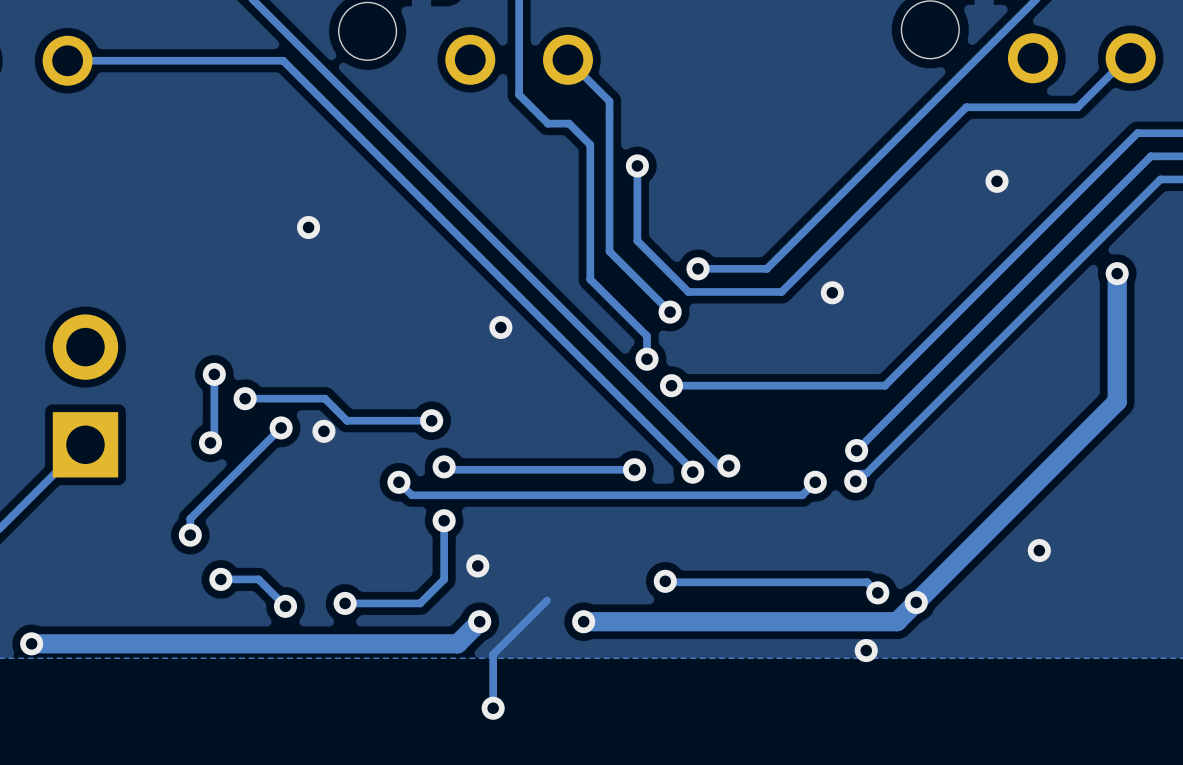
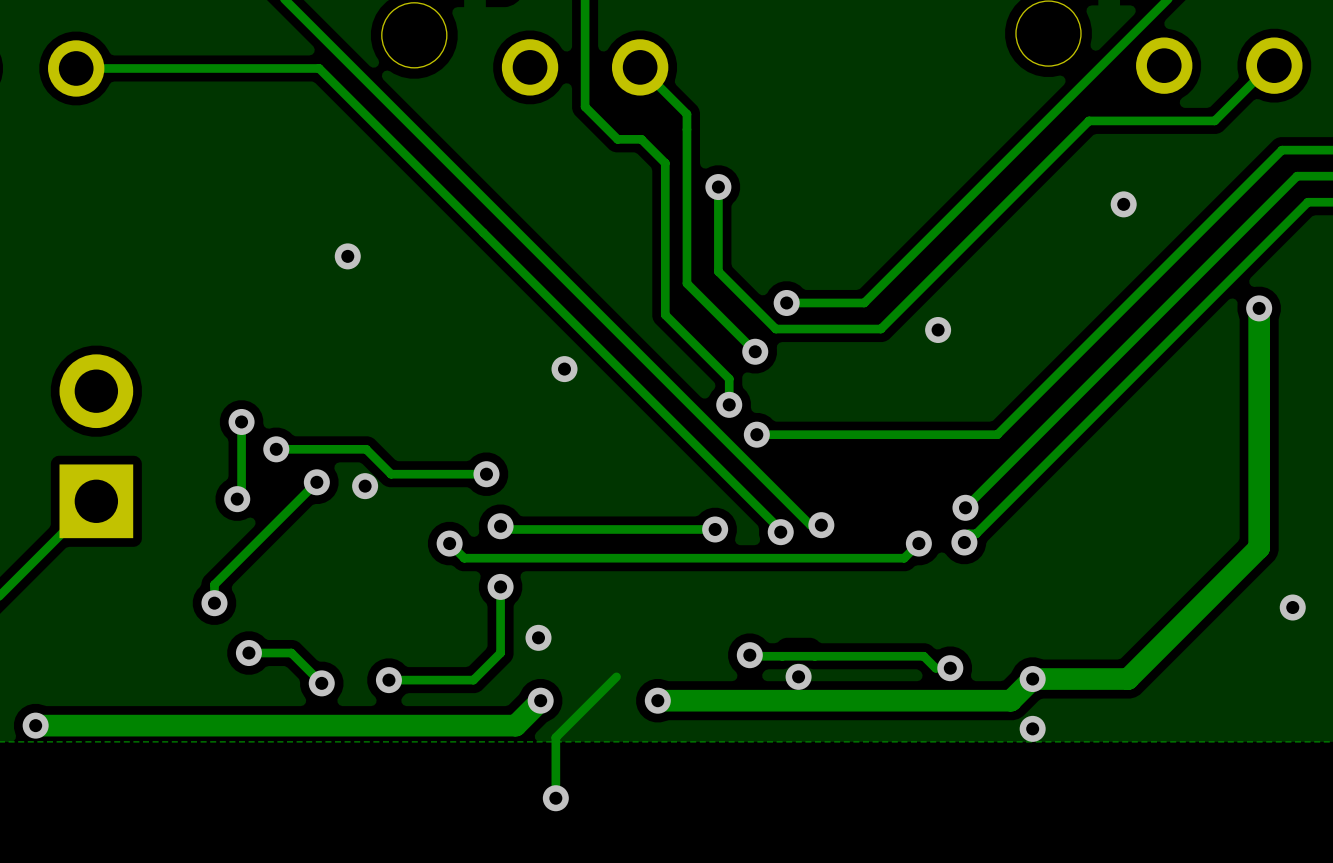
track: (1117, 401) (916, 602) -> (1259, 452) (1259, 547) (1128, 679) (1032, 679)
via: none -> (1292, 607)
via: (1039, 550) -> none
track: (819, 582) (867, 582) (877, 592) -> (923, 656) (935, 668) (950, 668)
via: none -> (950, 668)
via: (877, 592) -> none
via: none -> (798, 676)
via: none -> (1032, 728)
via: (866, 650) -> none

